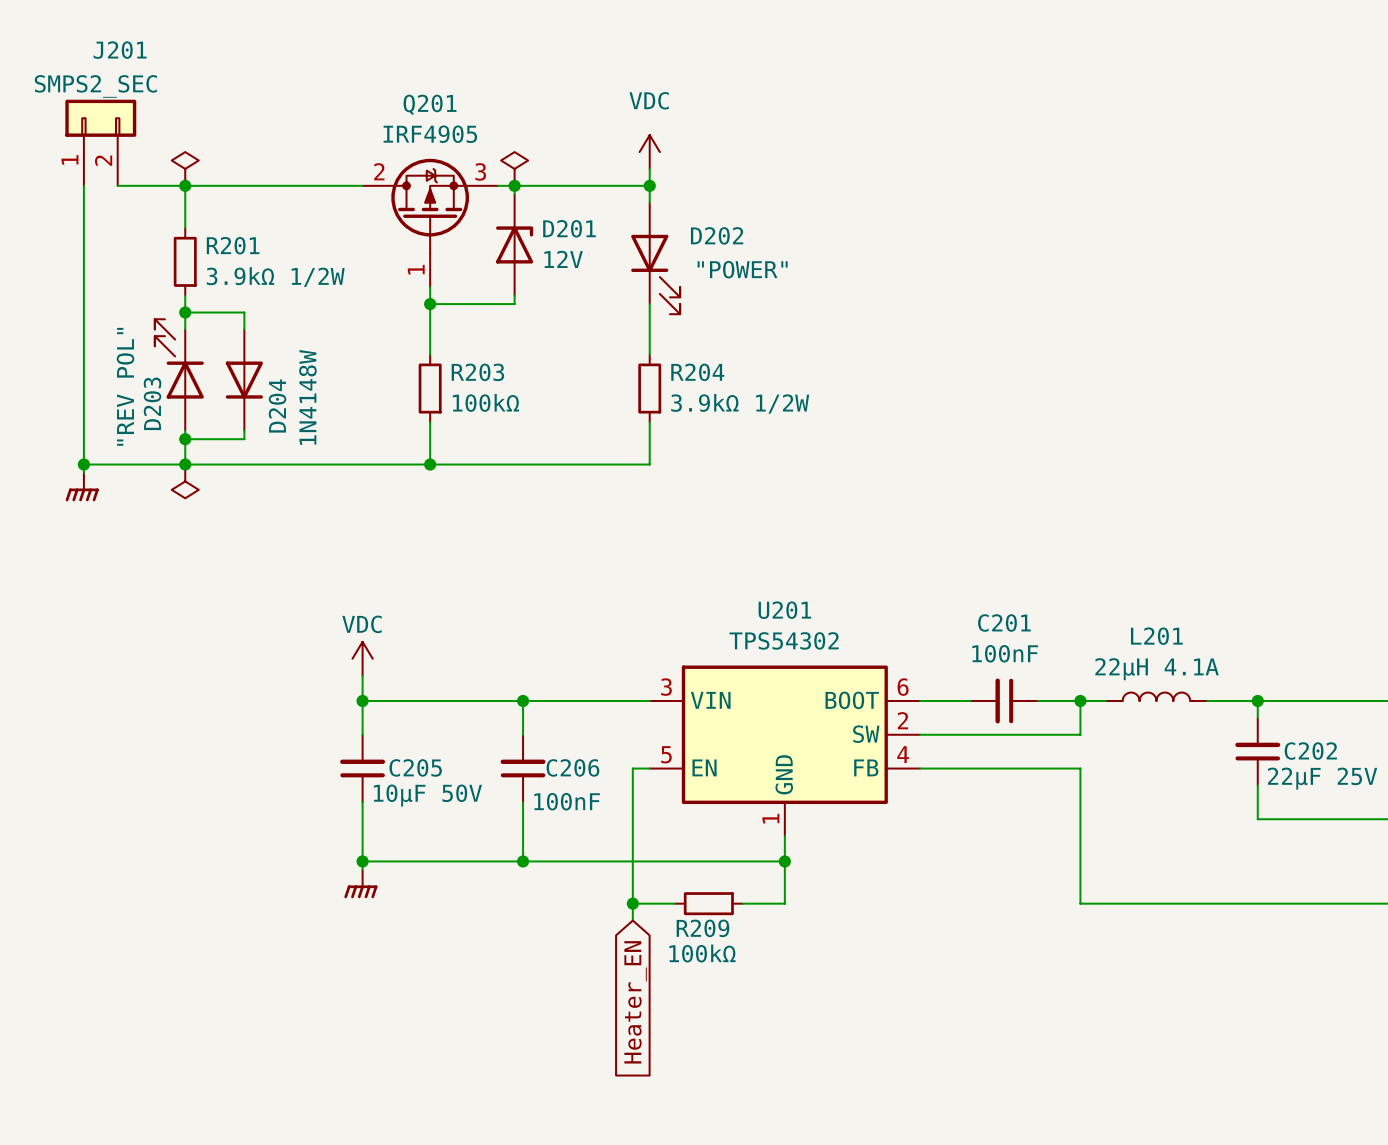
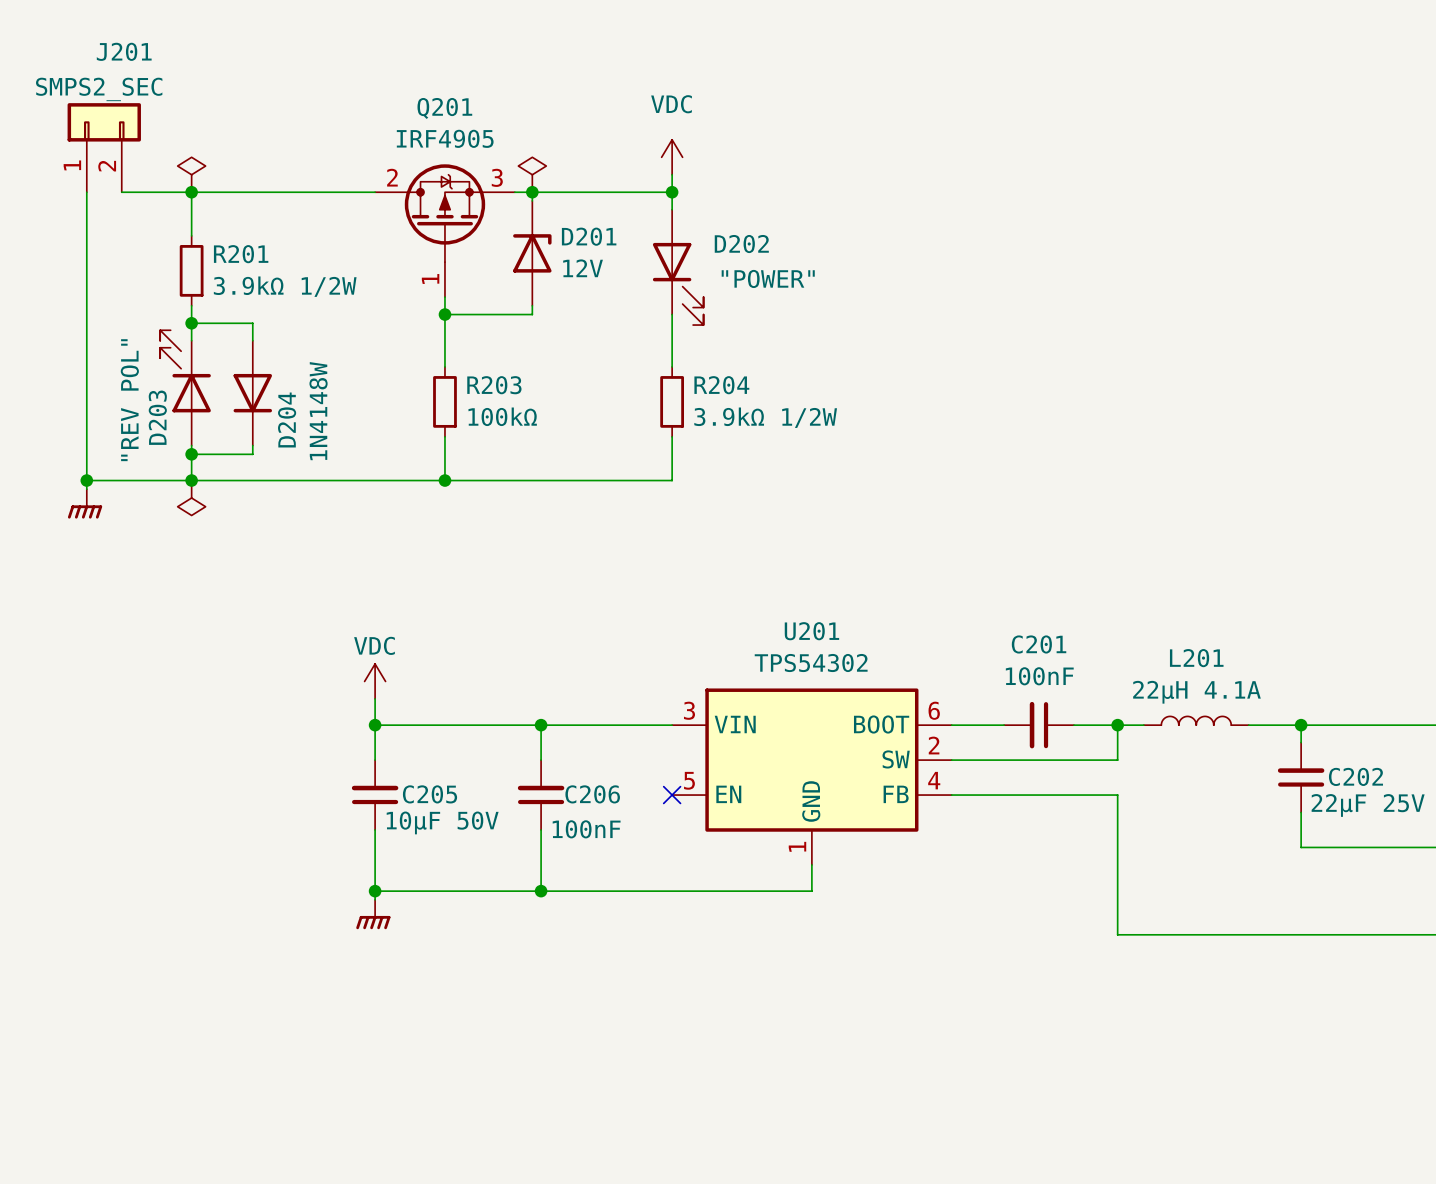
wire: (649, 768) (632, 768) (632, 920) -> none
no-connect mark: none -> (672, 795)
wire: (784, 861) (784, 903) (742, 903) -> none
junction: (784, 861) -> none
wire: (632, 903) (675, 903) -> none
junction: (632, 903) -> none
R209: 100kΩ (708, 903) -> none
global label: Heater_EN (635, 1002) -> none

